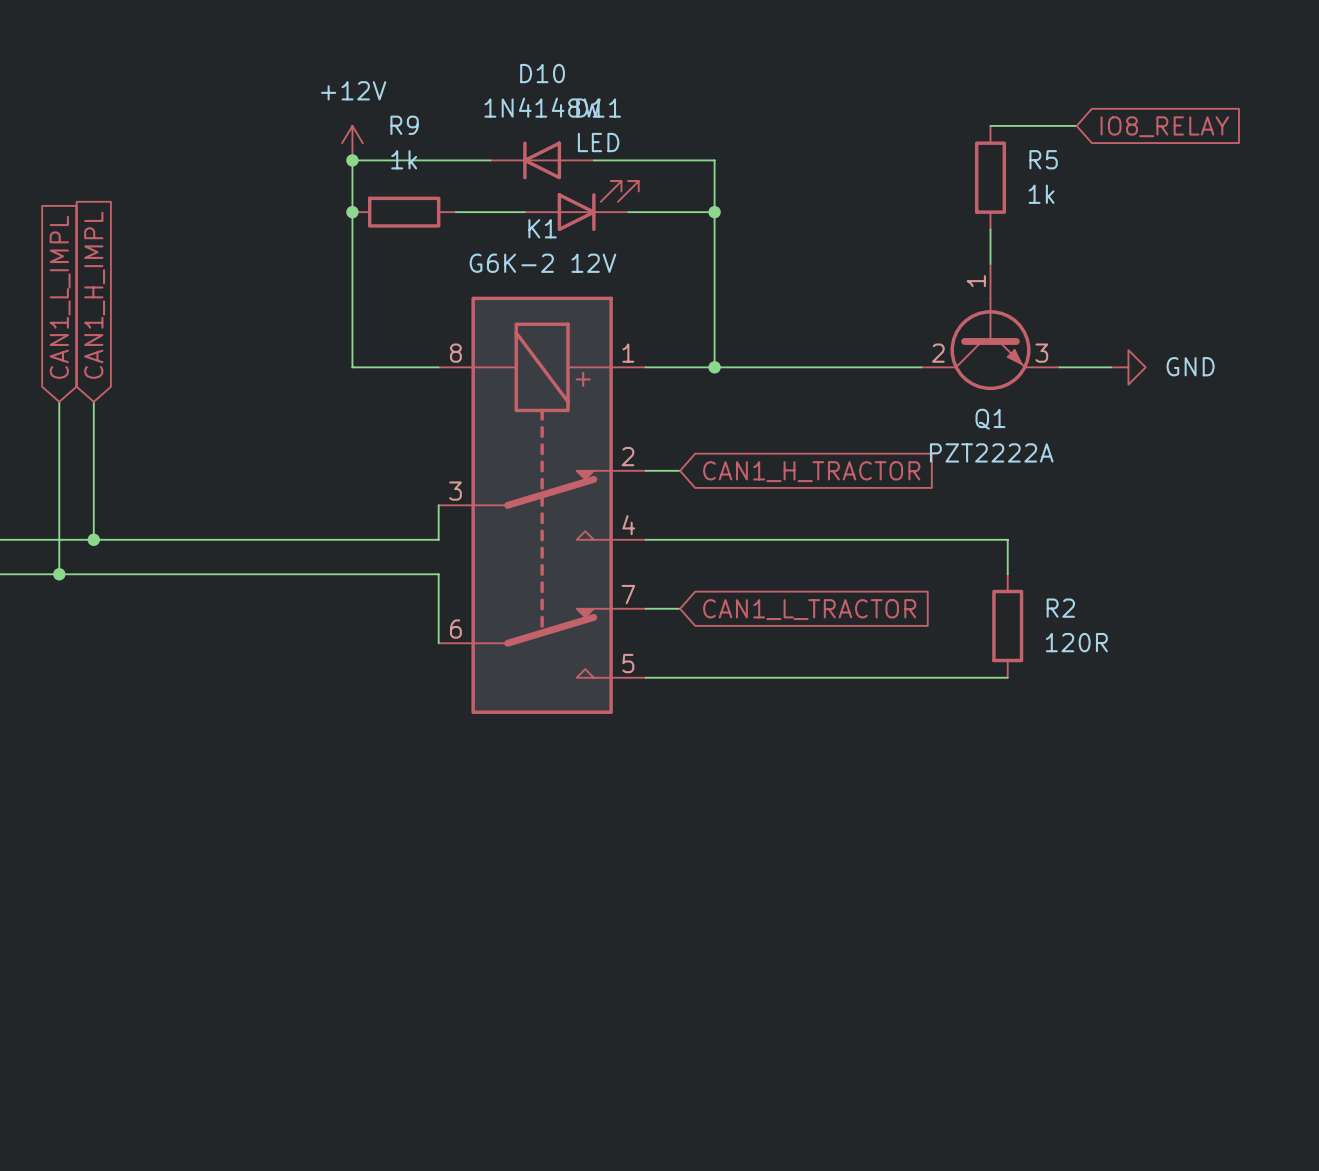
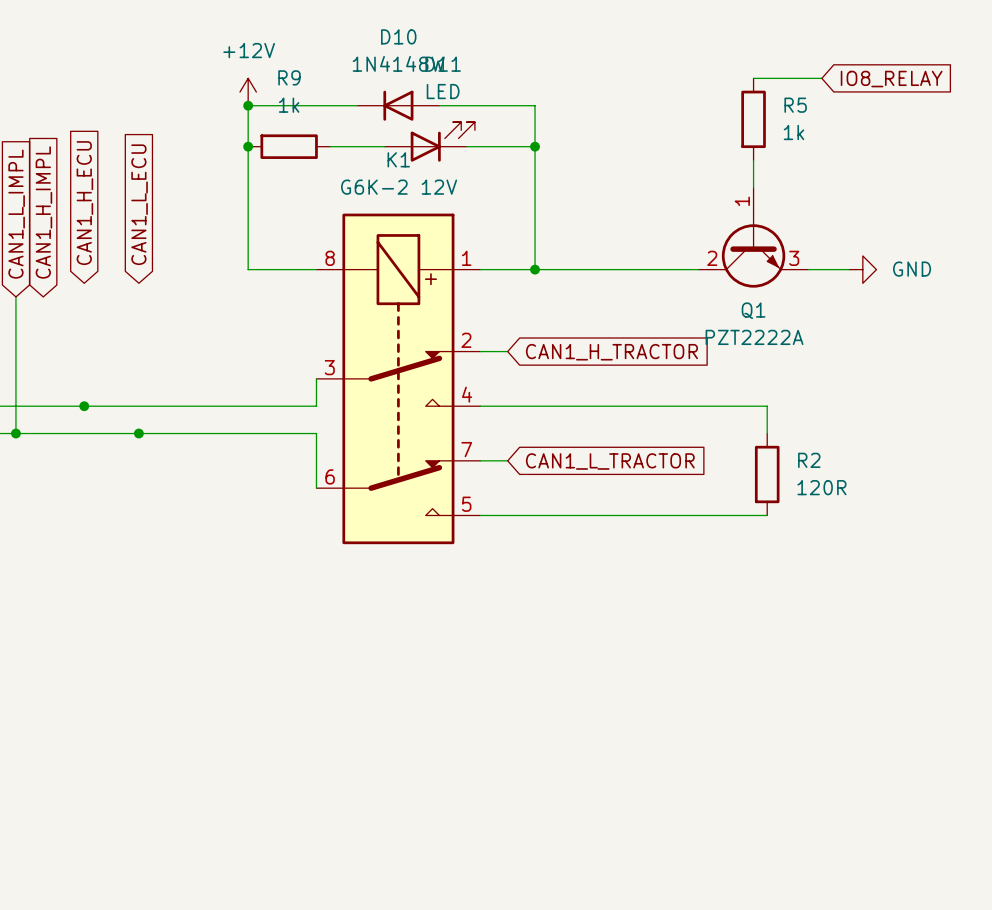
global label: none -> CAN1_H_ECU (84, 203)
global label: none -> CAN1_L_ECU (139, 204)
wire: (93, 401) (93, 539) -> none
junction position: (93, 539) -> (84, 406)
junction: none -> (138, 433)

